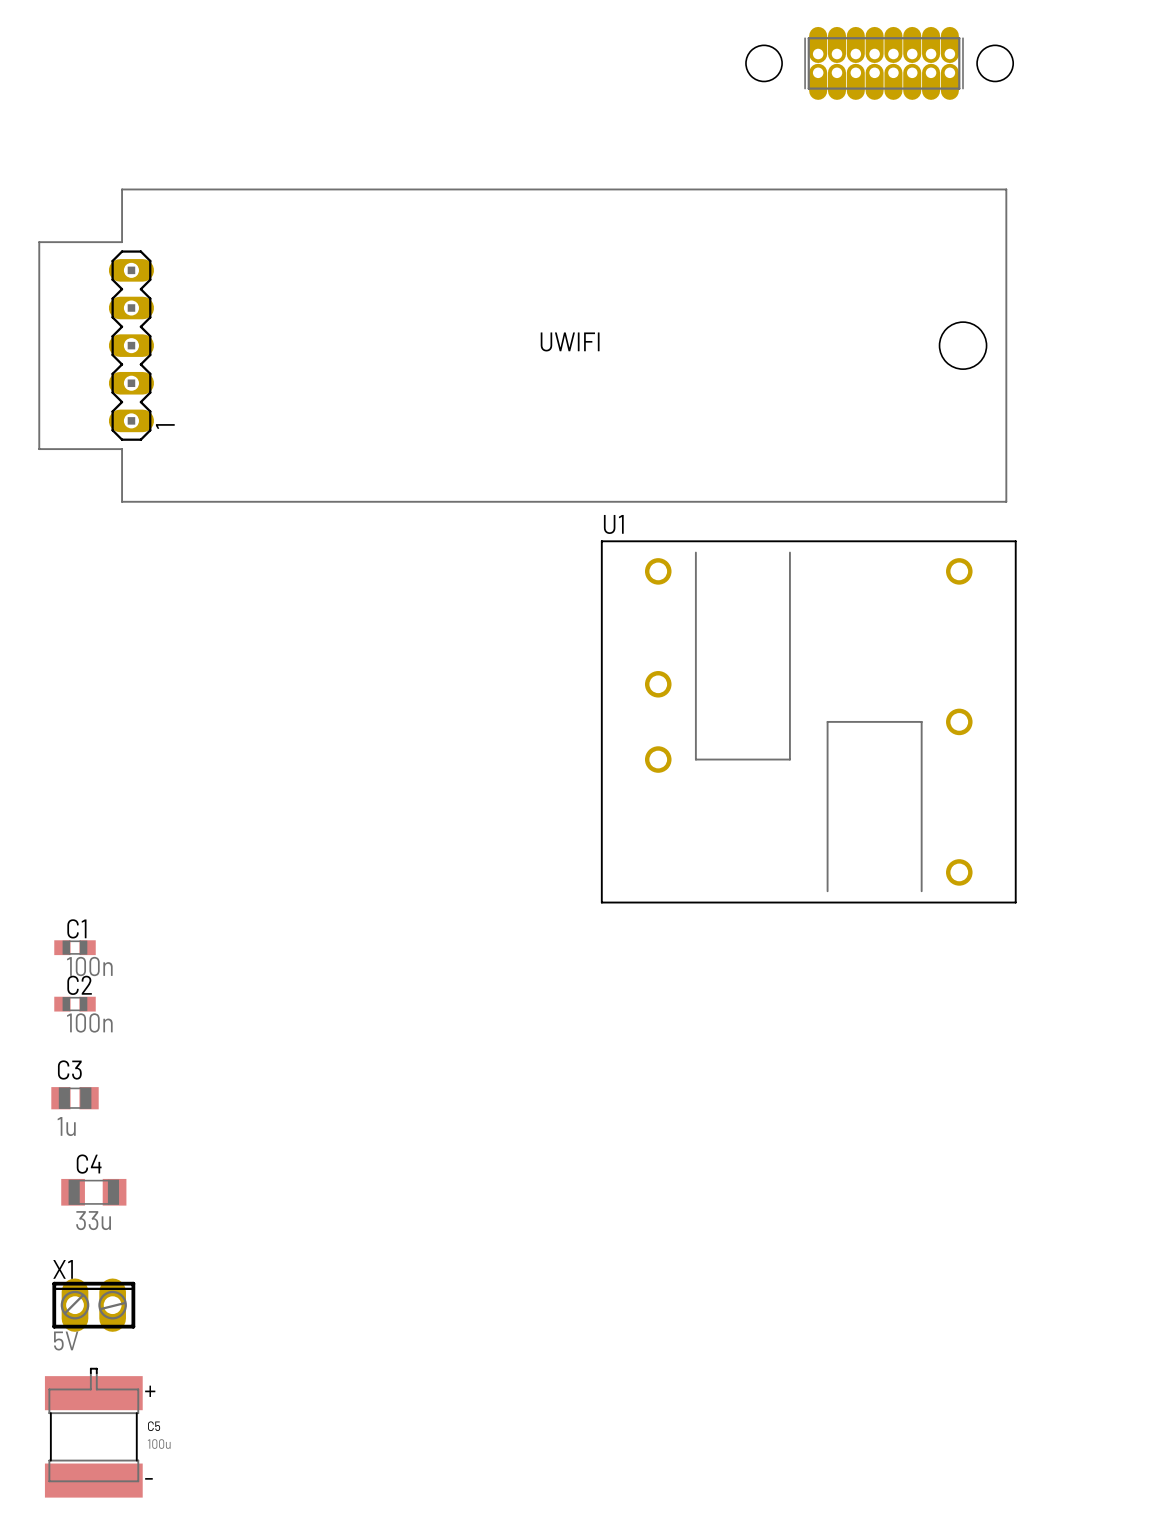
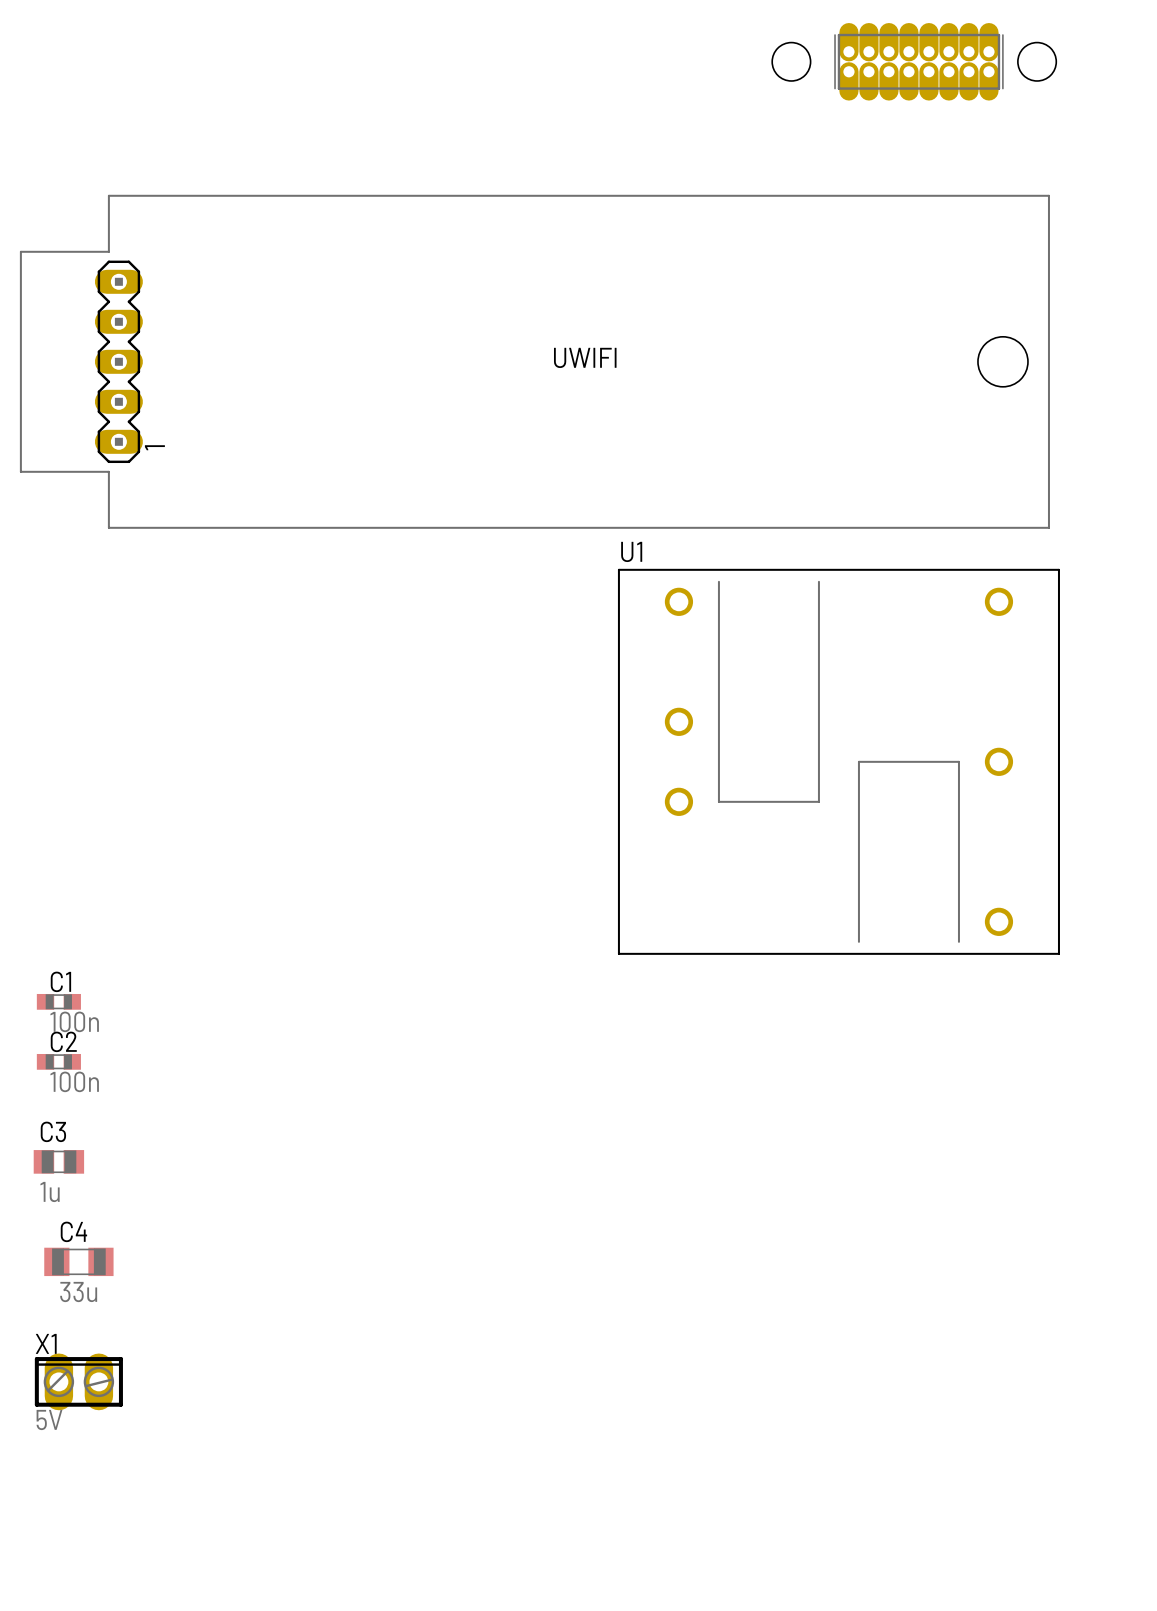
C5: 100u (93, 1432) -> none

